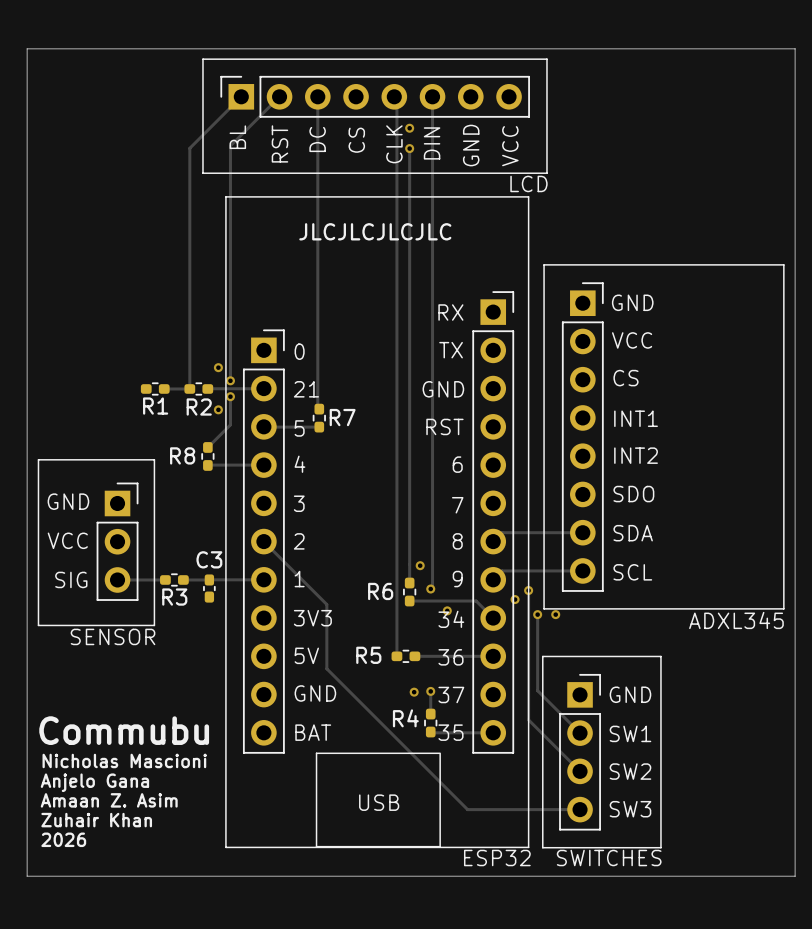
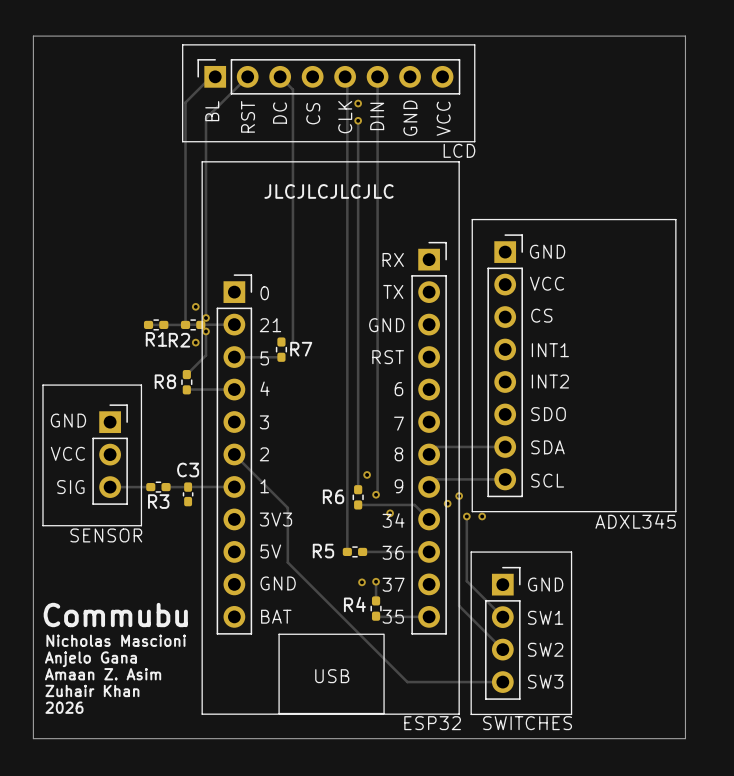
track: (241, 96) (189, 148) (189, 388) -> (215, 72) (185, 102) (185, 324) (171, 324)
track: (317, 96) (319, 409) -> (280, 76) (292, 89) (292, 342)
R1 position: (155, 388) -> (156, 324)
R2 position: (198, 388) -> (193, 324)

